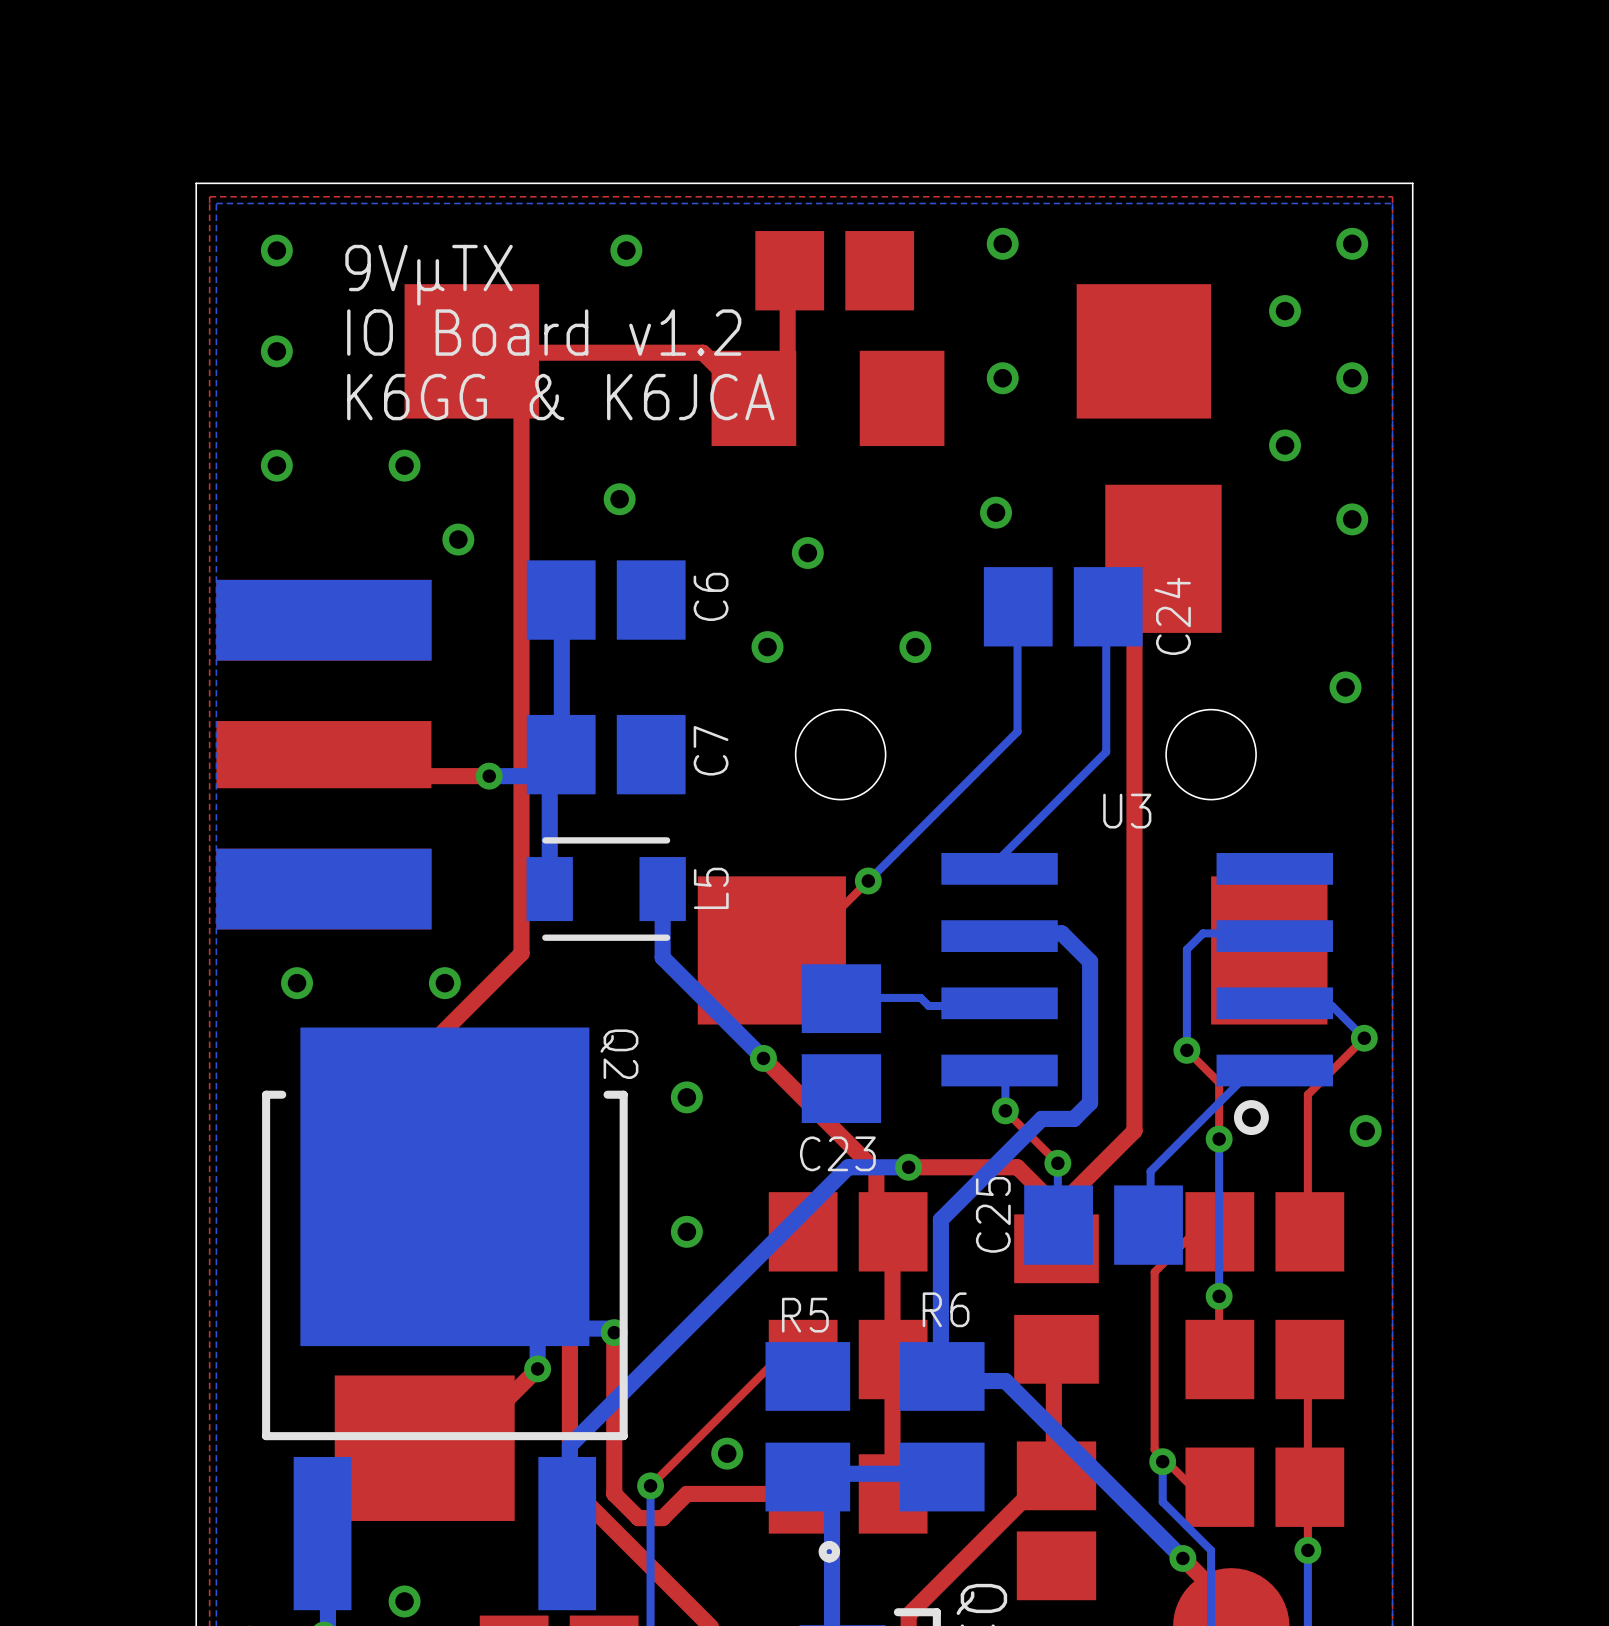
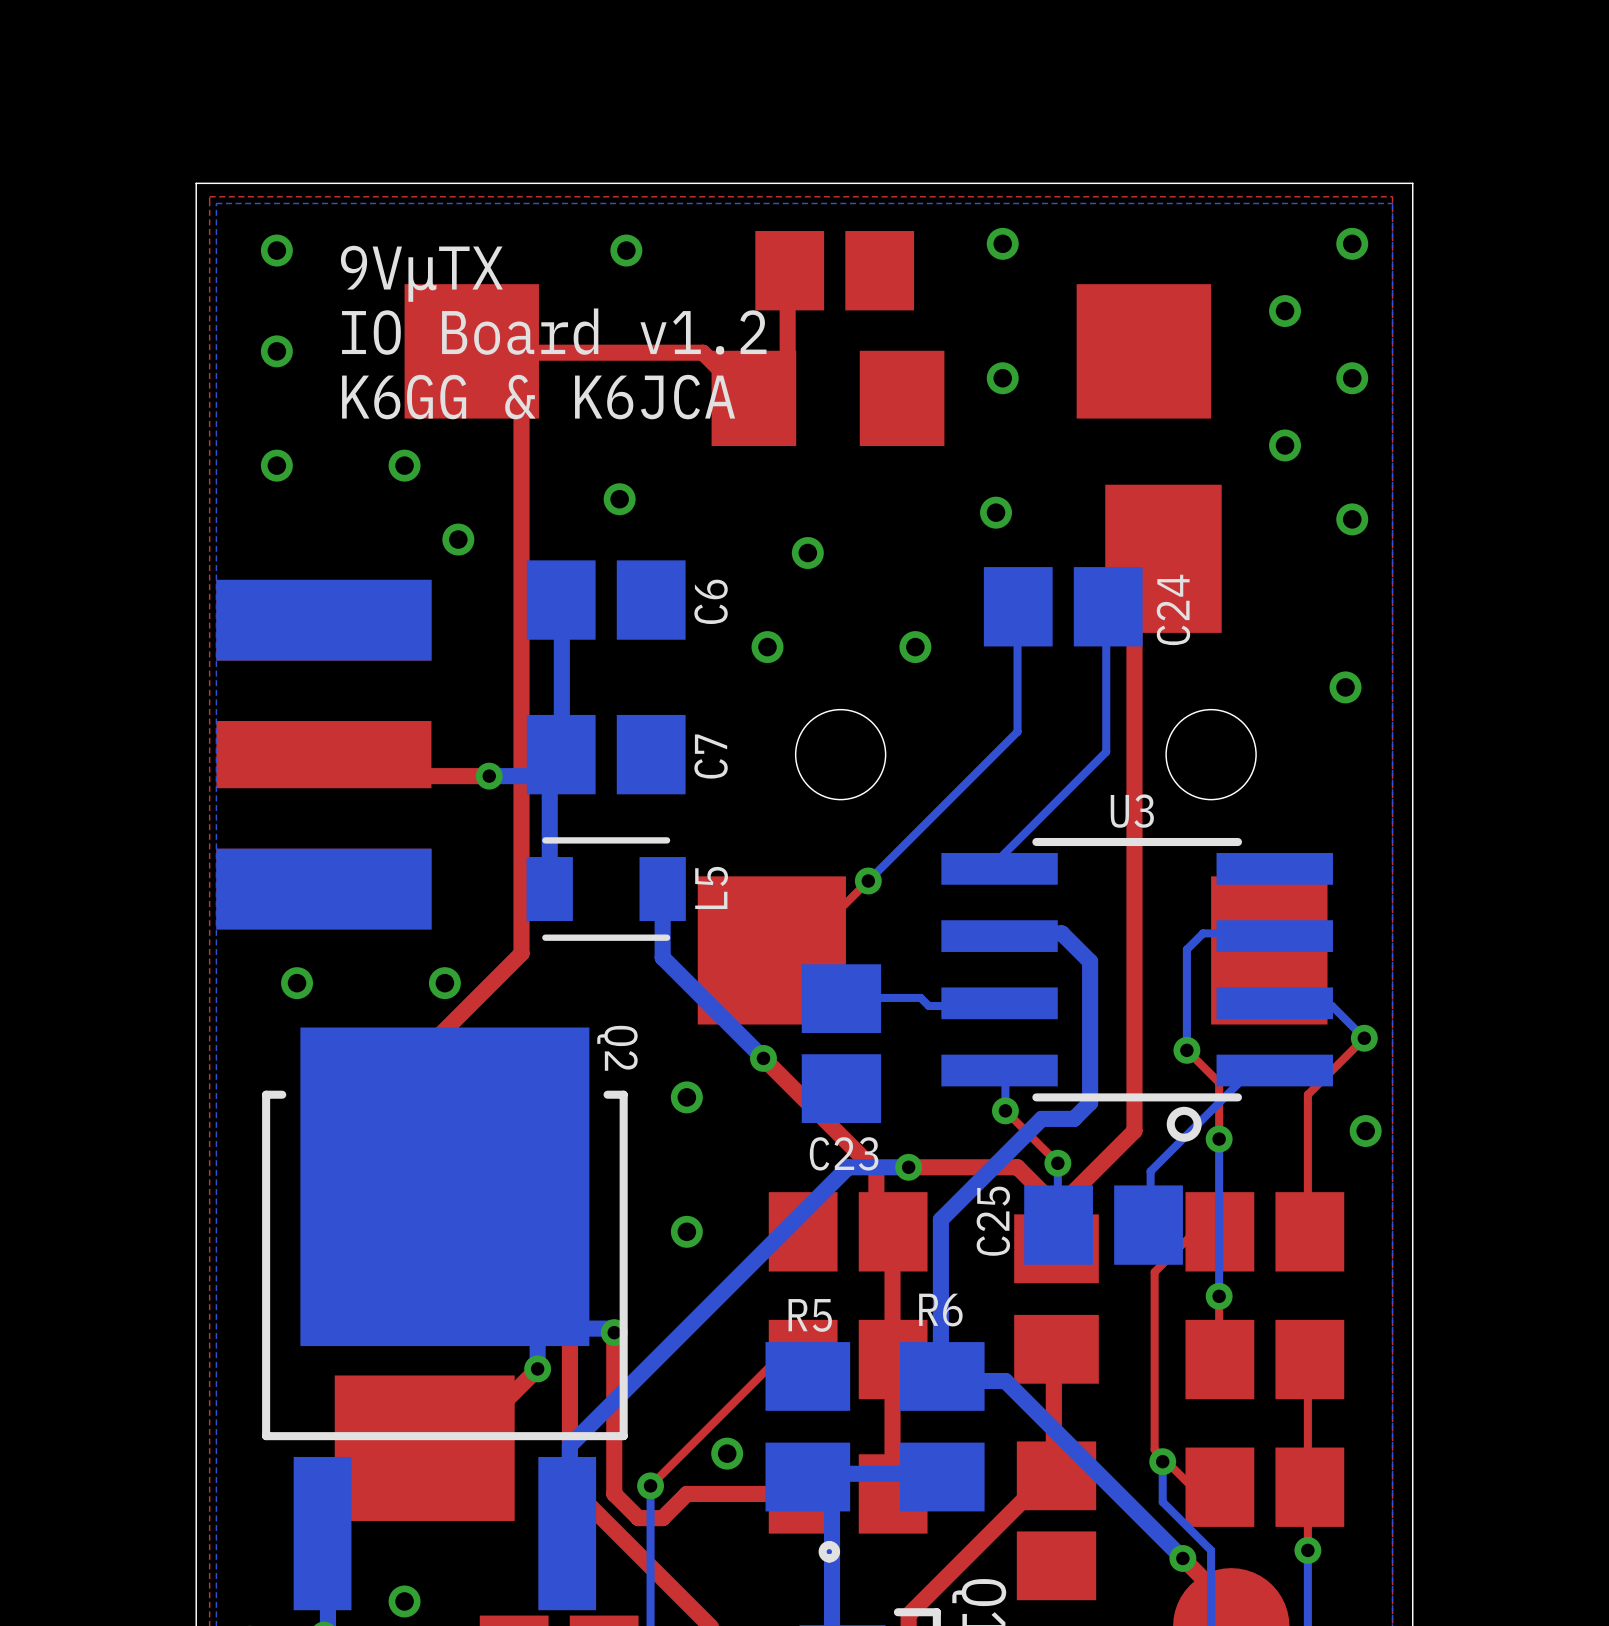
line: none -> (1237, 842) (1036, 842)
line: none -> (1237, 1097) (1036, 1097)
drawing position: (1251, 1117) -> (1184, 1124)

